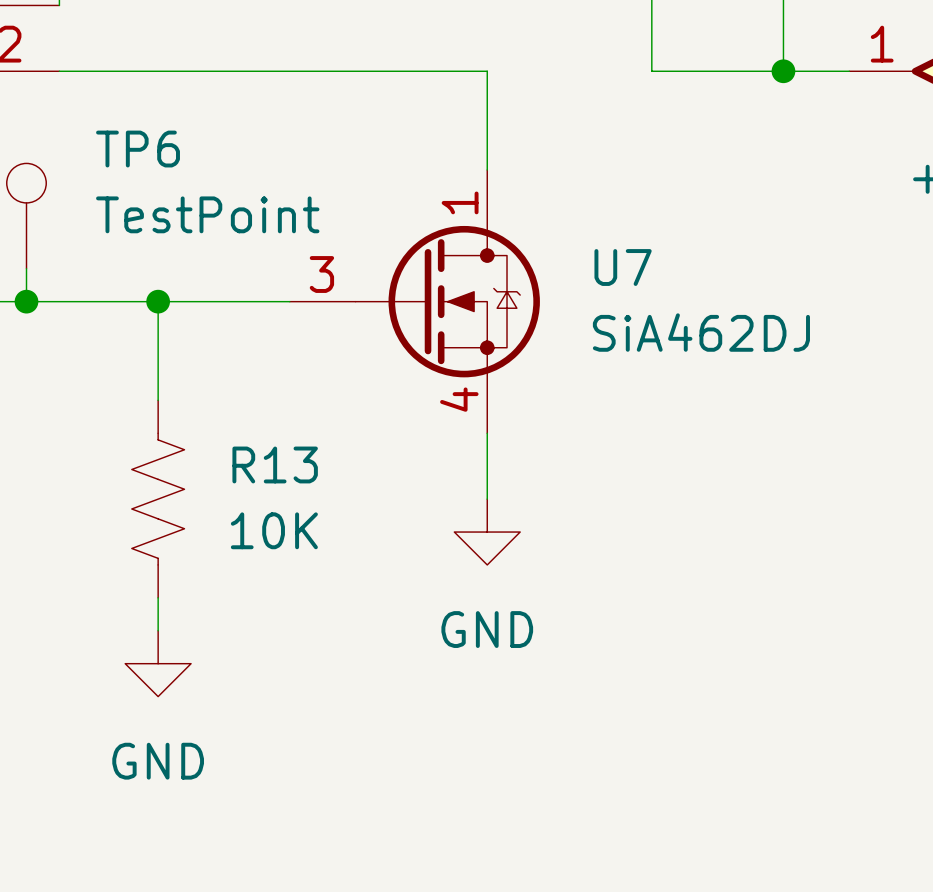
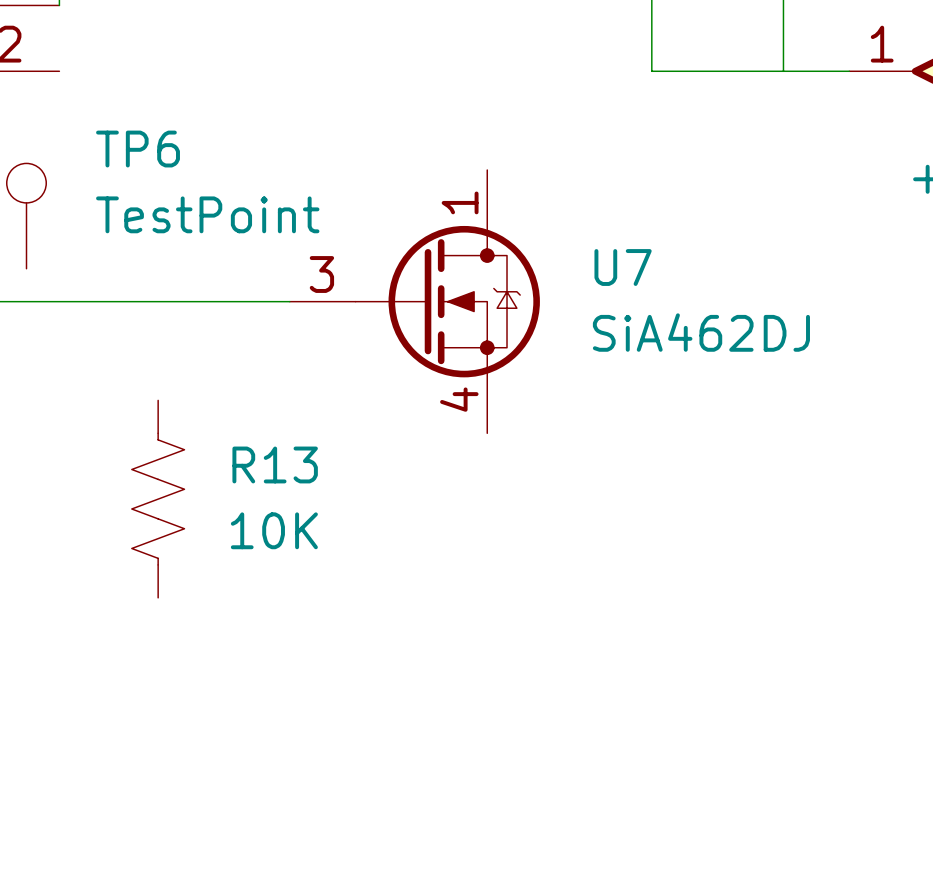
wire: (59, 71) (487, 71) (487, 170) -> none
junction: (783, 71) -> none
wire: (26, 268) (26, 301) -> none
junction: (26, 301) -> none
wire: (158, 301) (158, 400) -> none
junction: (158, 301) -> none
wire: (487, 433) (487, 499) -> none
power symbol: GND (487, 532) -> none
wire: (158, 597) (158, 630) -> none
power symbol: GND (158, 663) -> none

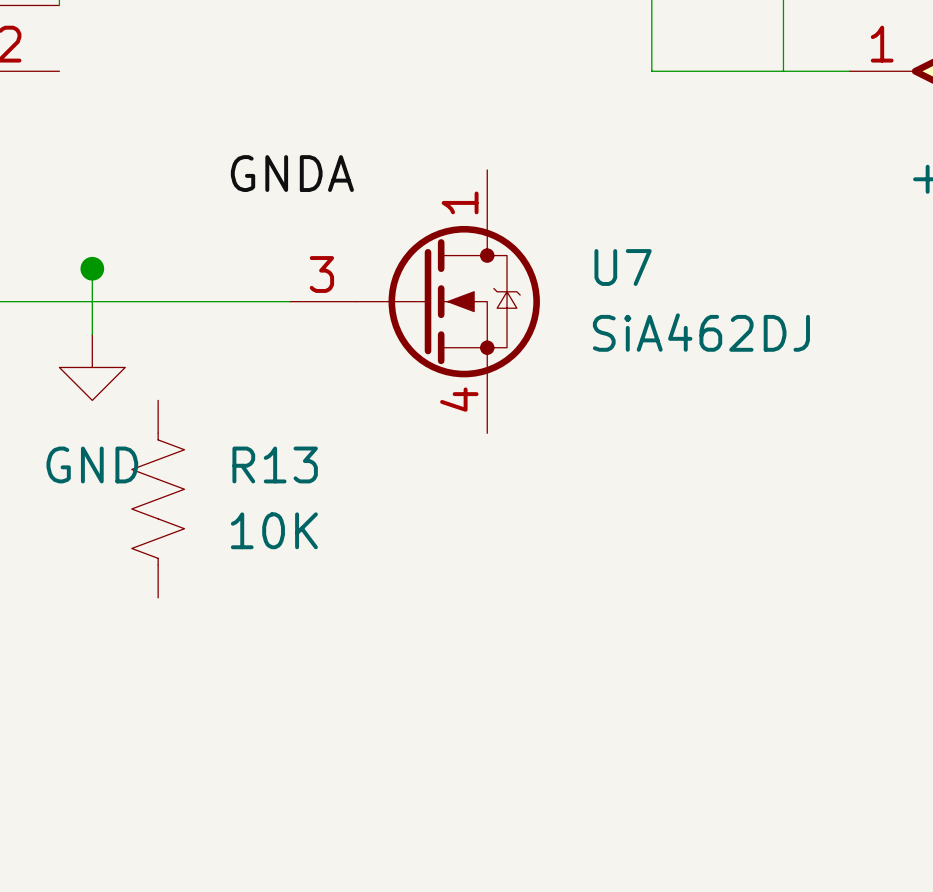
label: none -> GNDA (292, 173)
TP6: TestPoint (26, 216) -> none
wire: none -> (92, 268) (92, 334)
junction: none -> (92, 268)
power symbol: none -> GND (92, 367)

